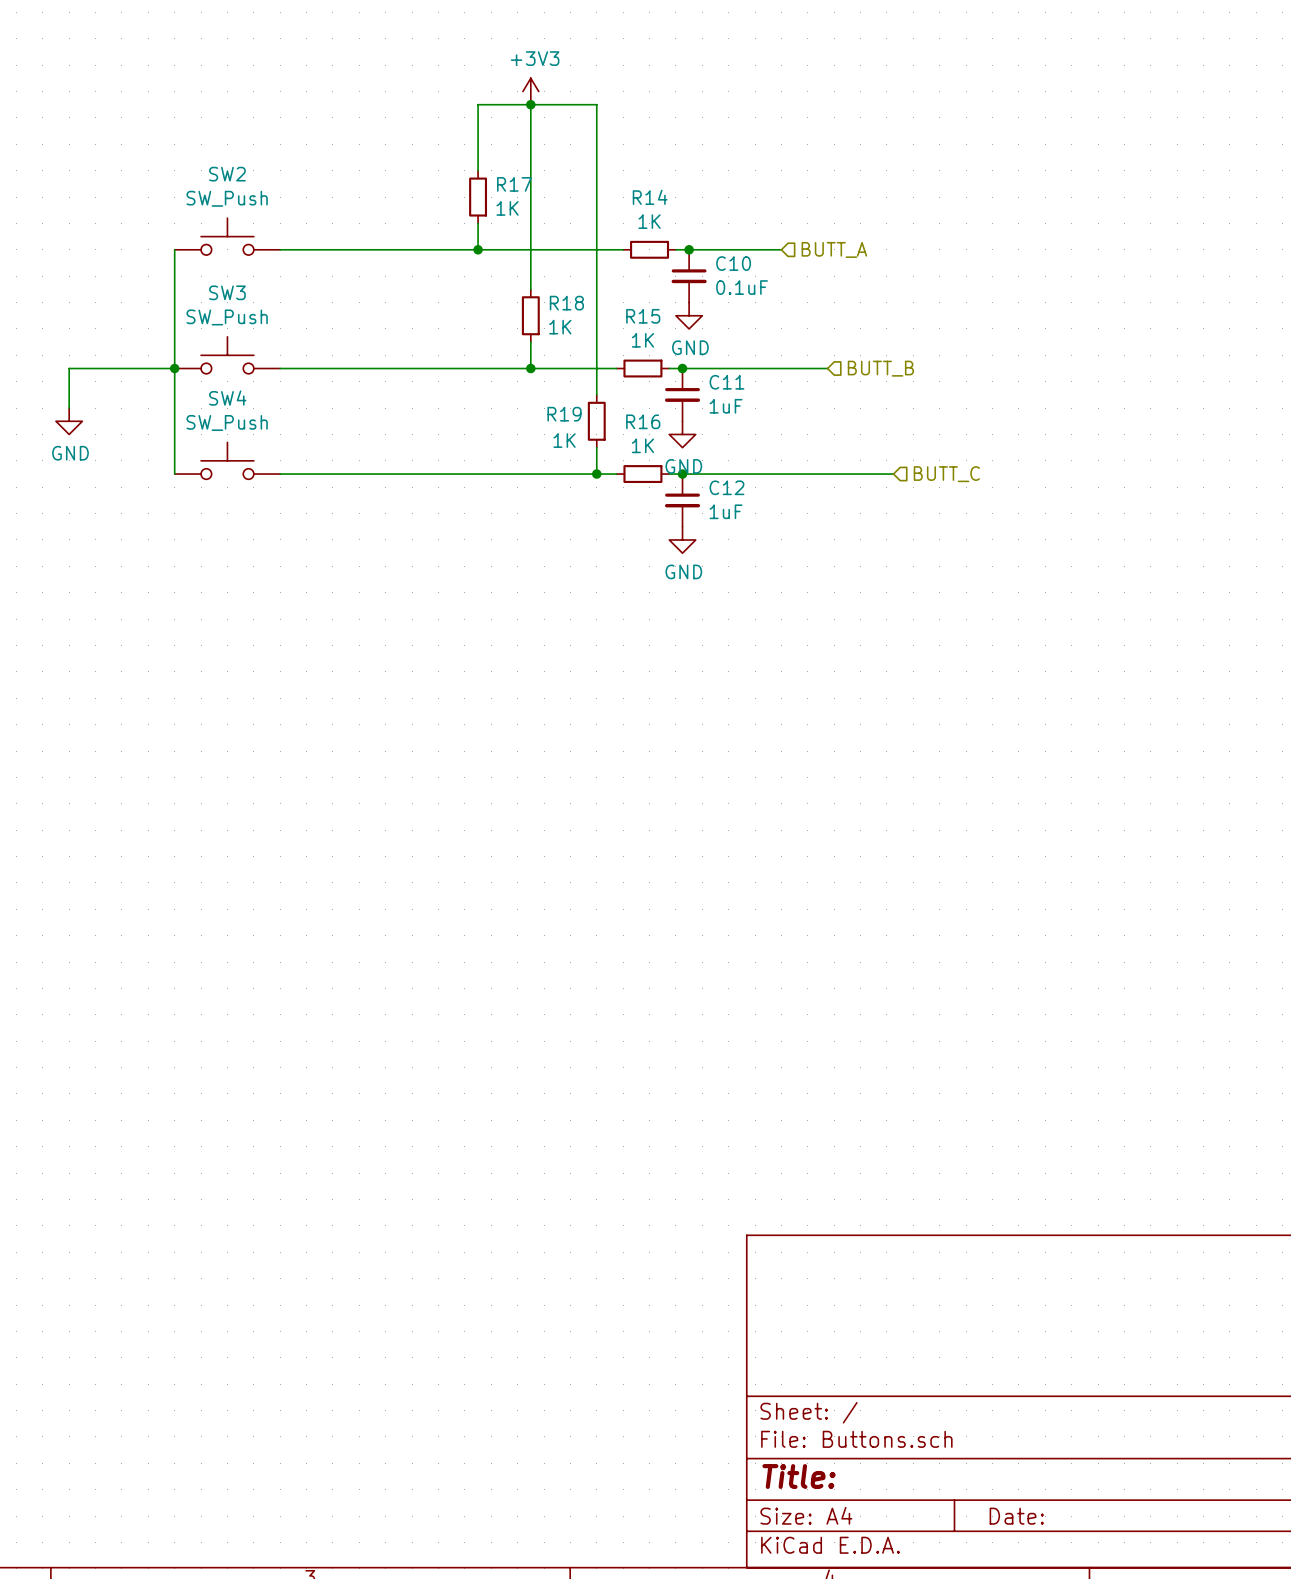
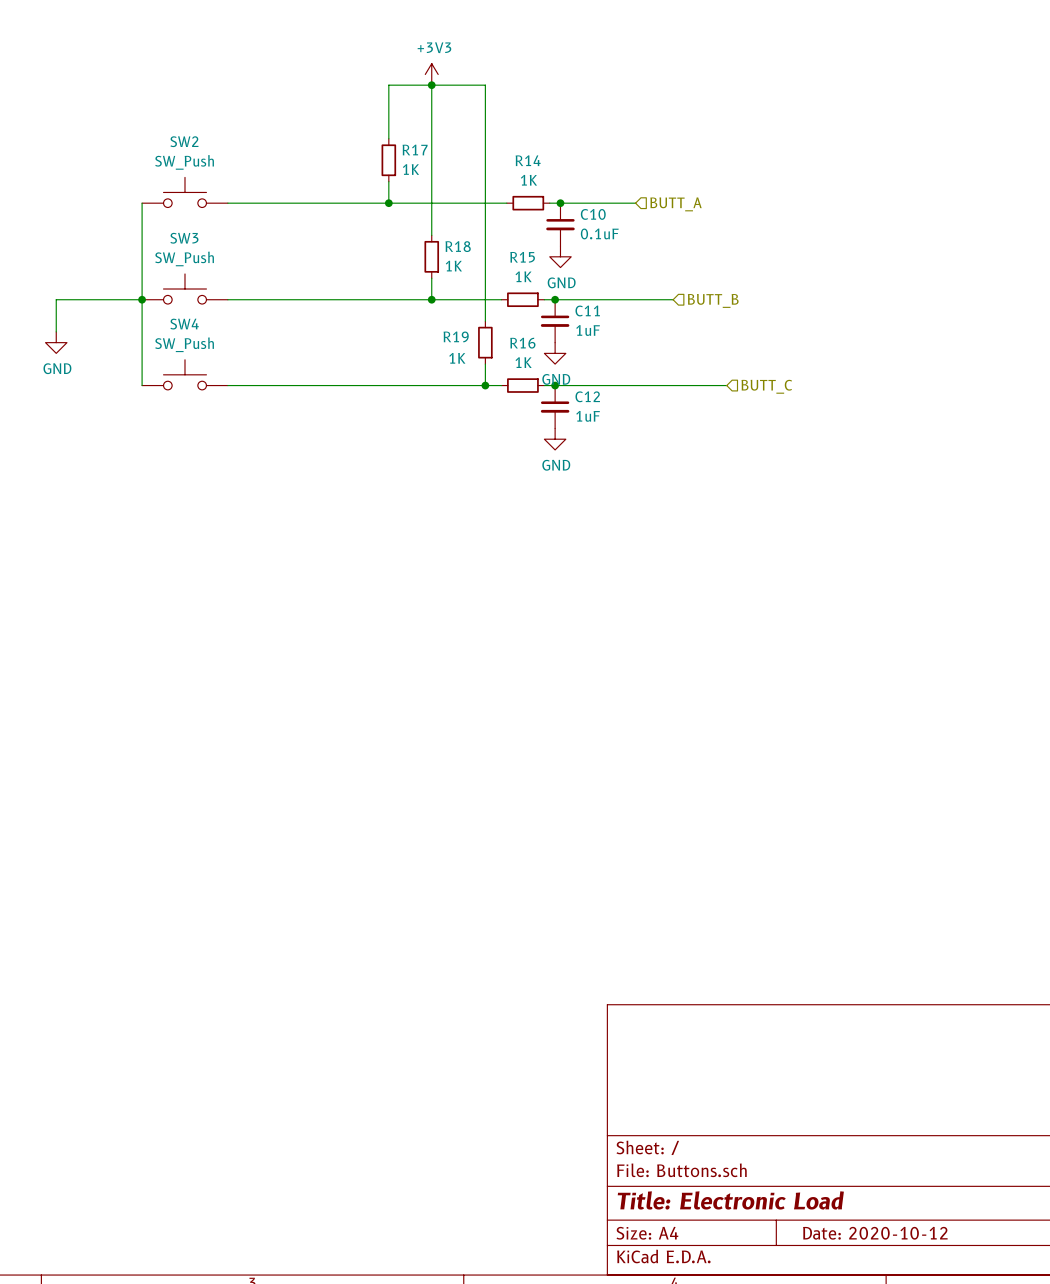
title block: Title: (799, 1476) -> Title: Electronic Load (730, 1200)
title block: Date: (1016, 1516) -> Date: 2020-10-12 (875, 1233)

